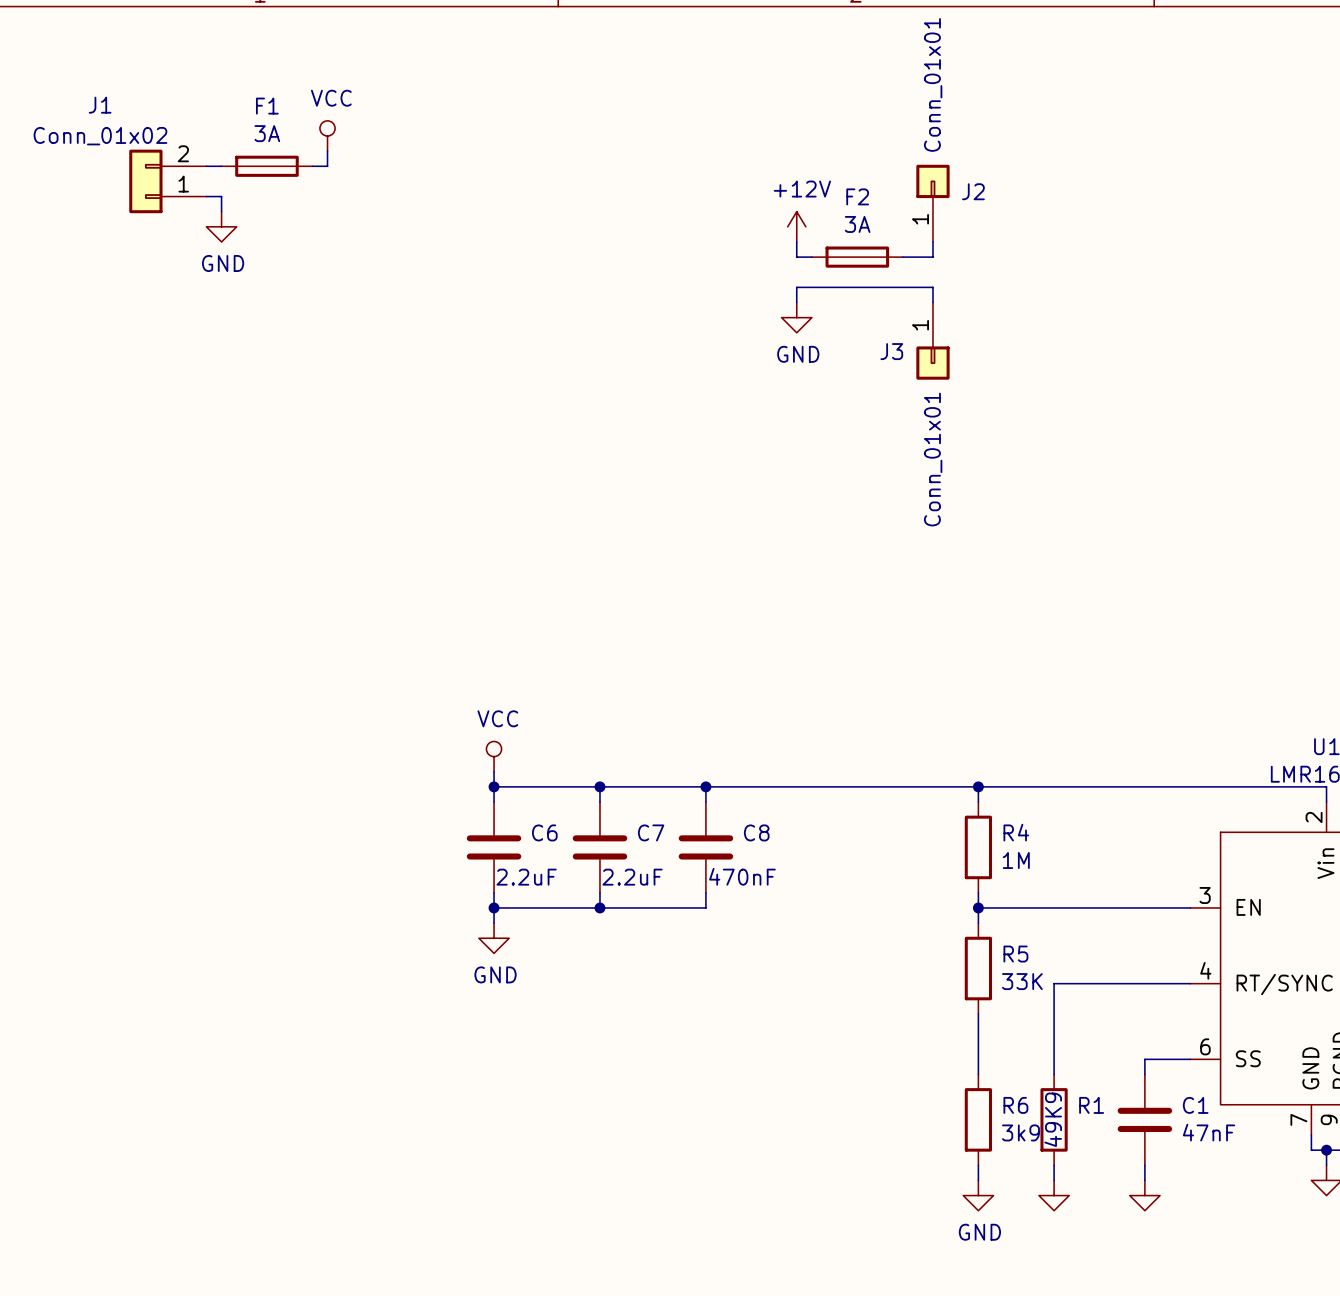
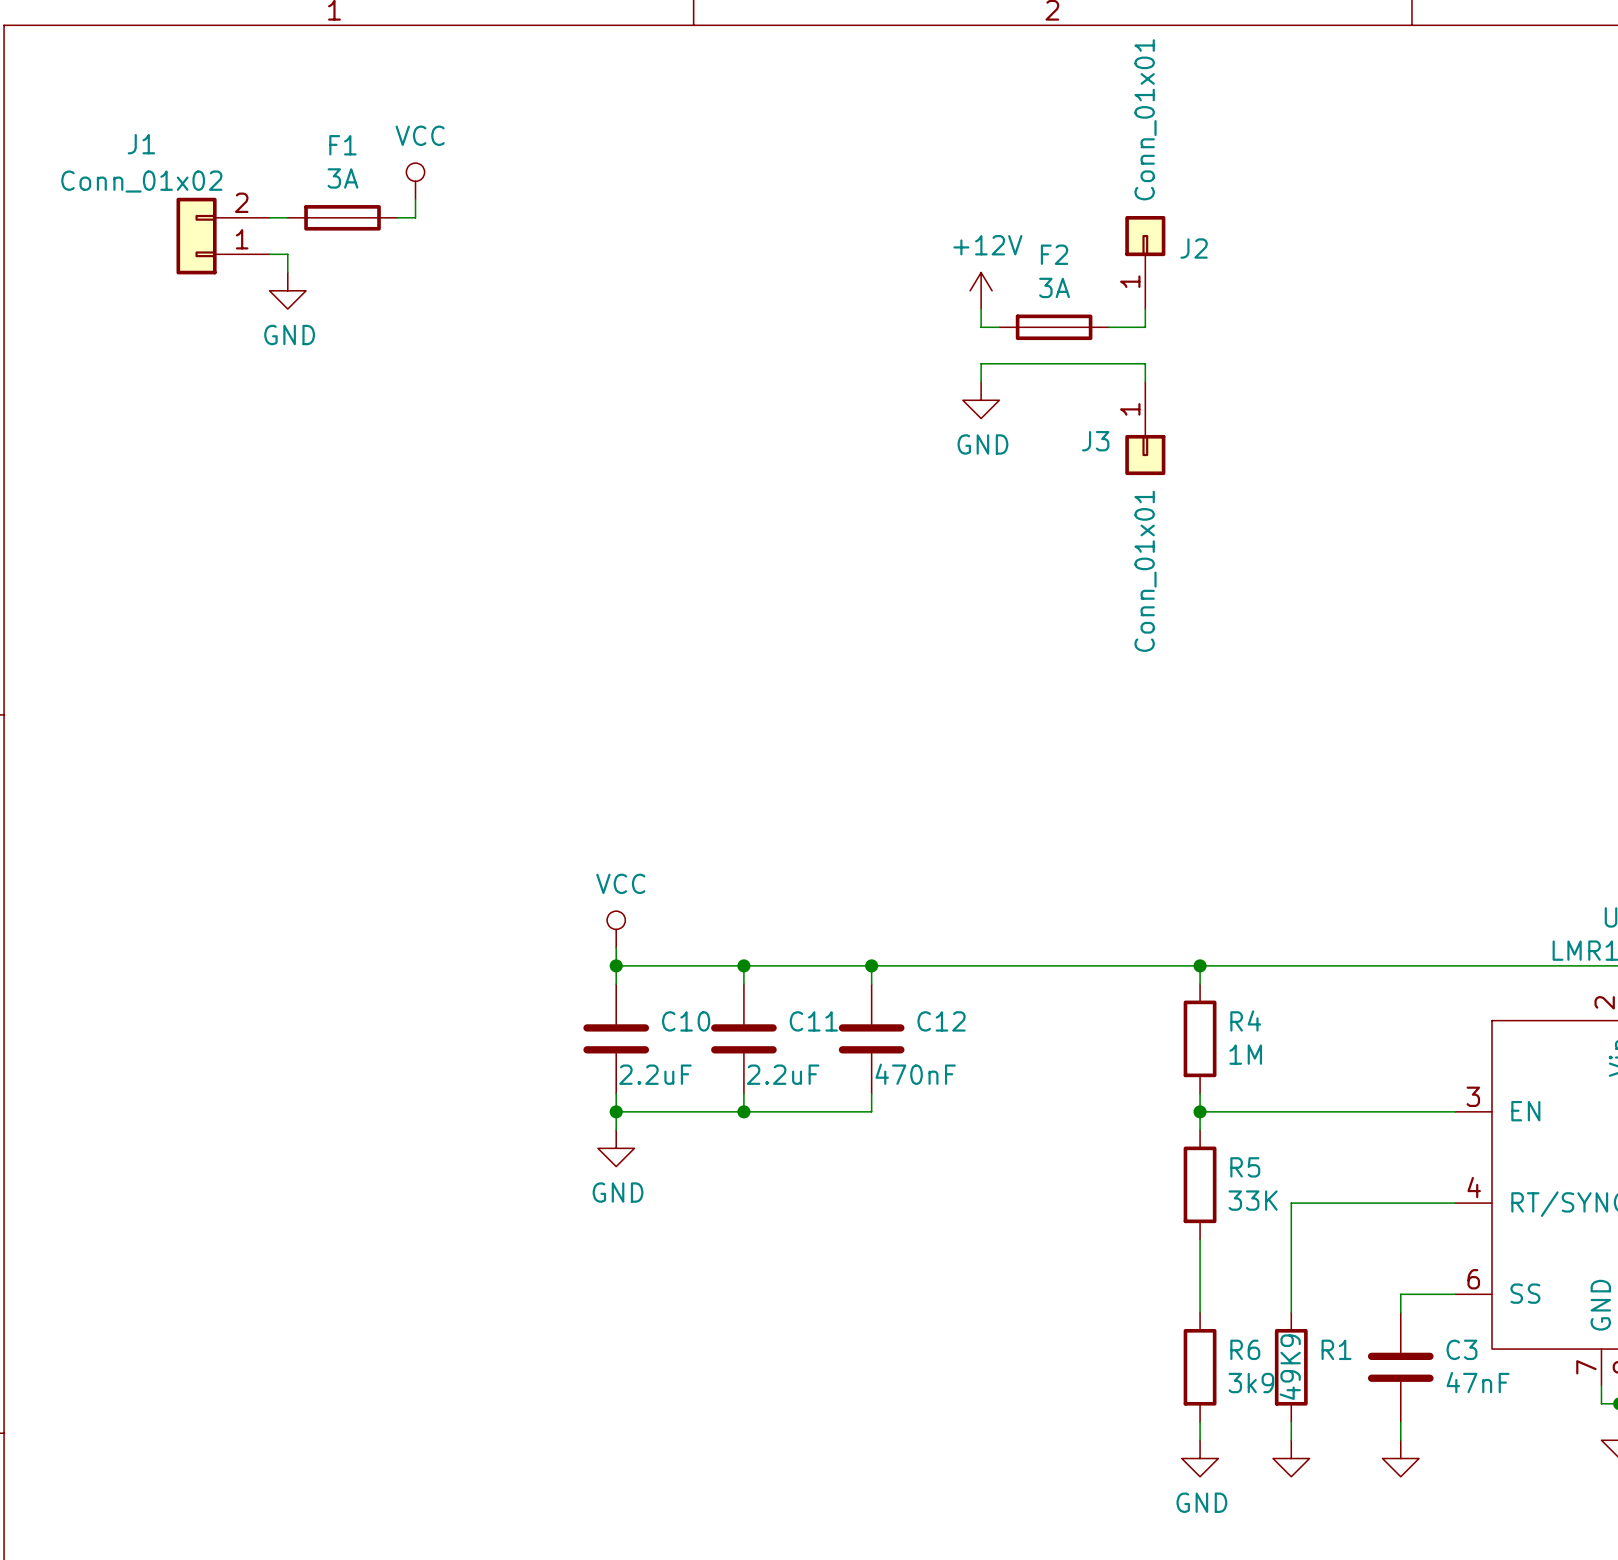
C6 name: C6 (544, 832) -> C10 (686, 1021)
C7 name: C7 (651, 832) -> C11 (813, 1021)
C8 name: C8 (756, 832) -> C12 (941, 1021)
C1 name: C1 (1195, 1105) -> C3 (1461, 1349)

